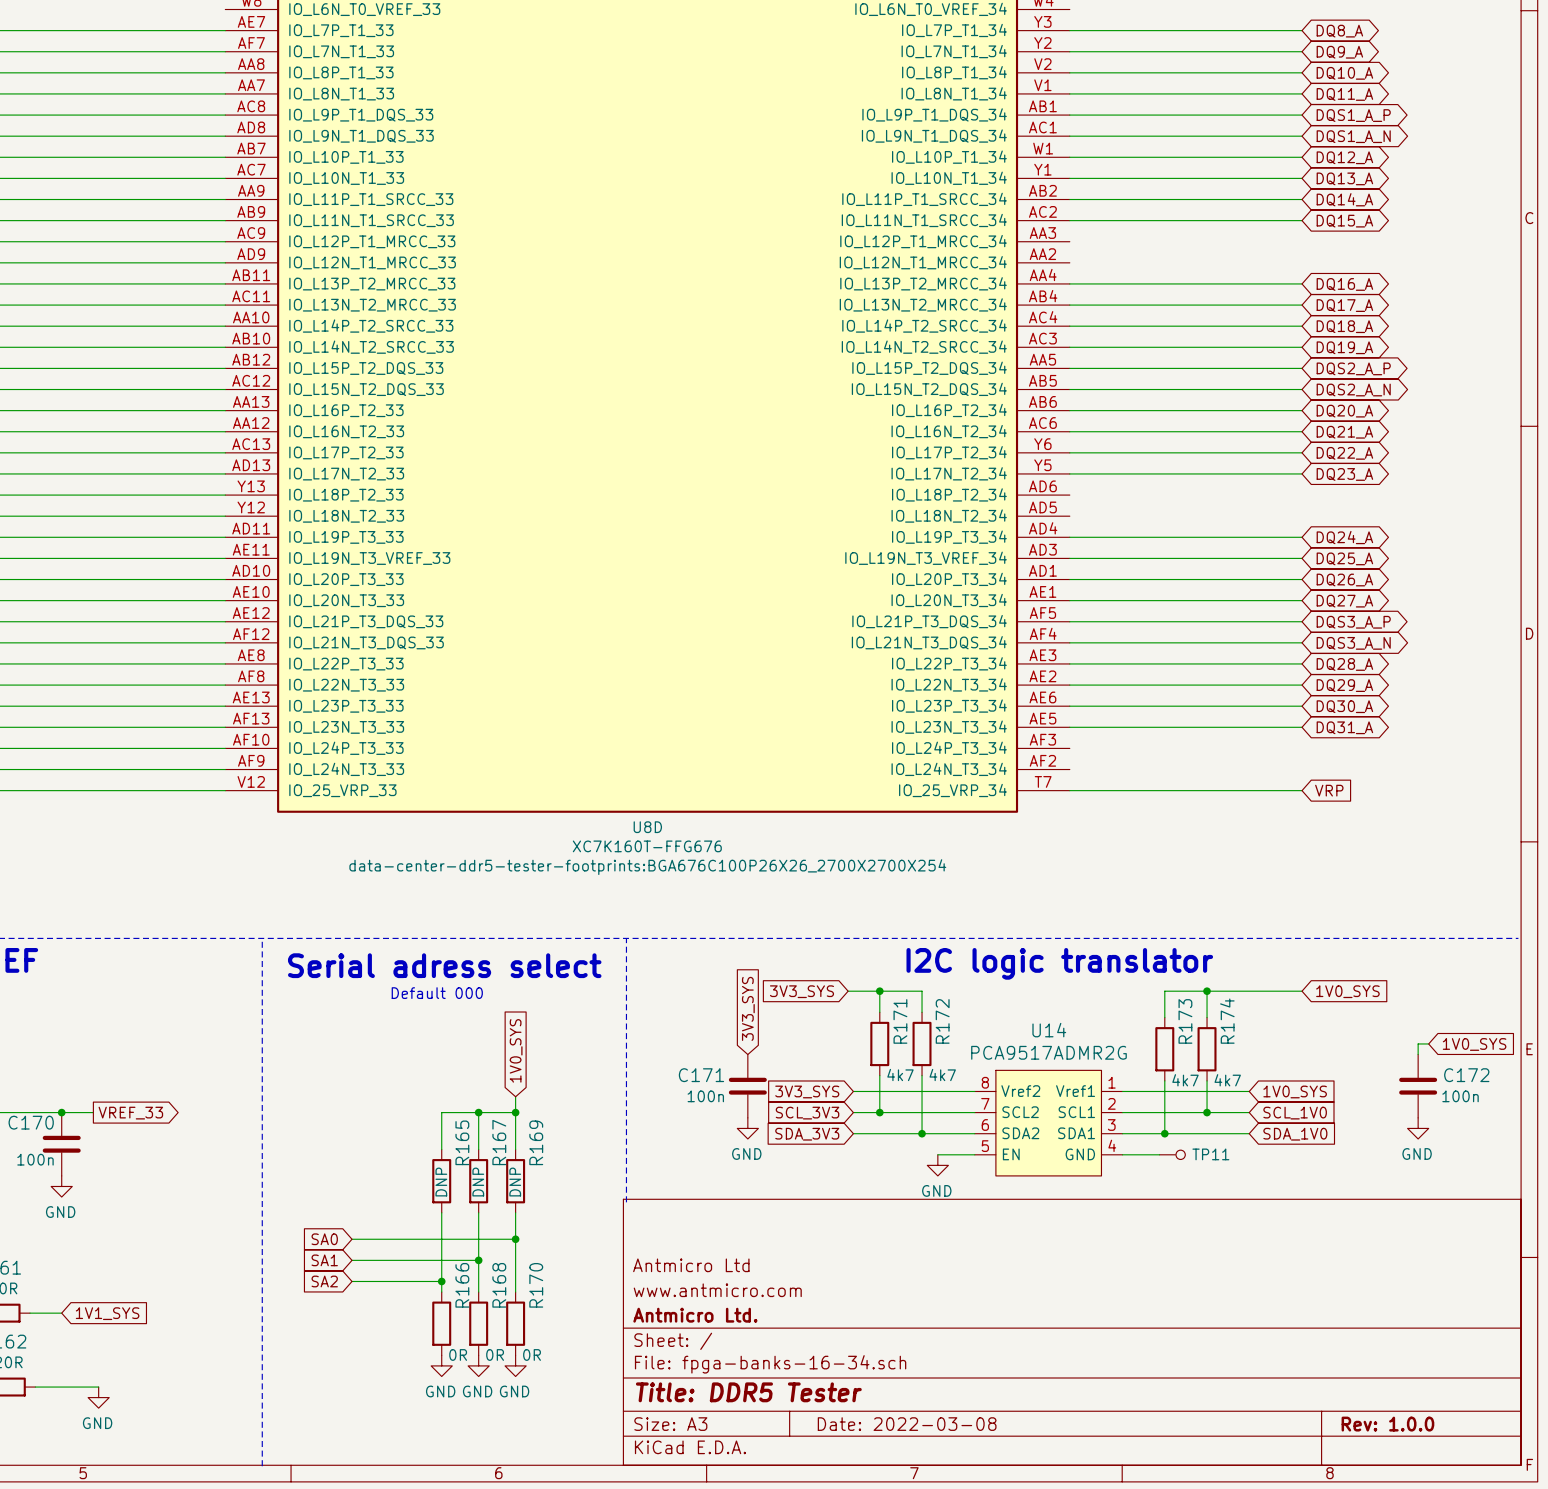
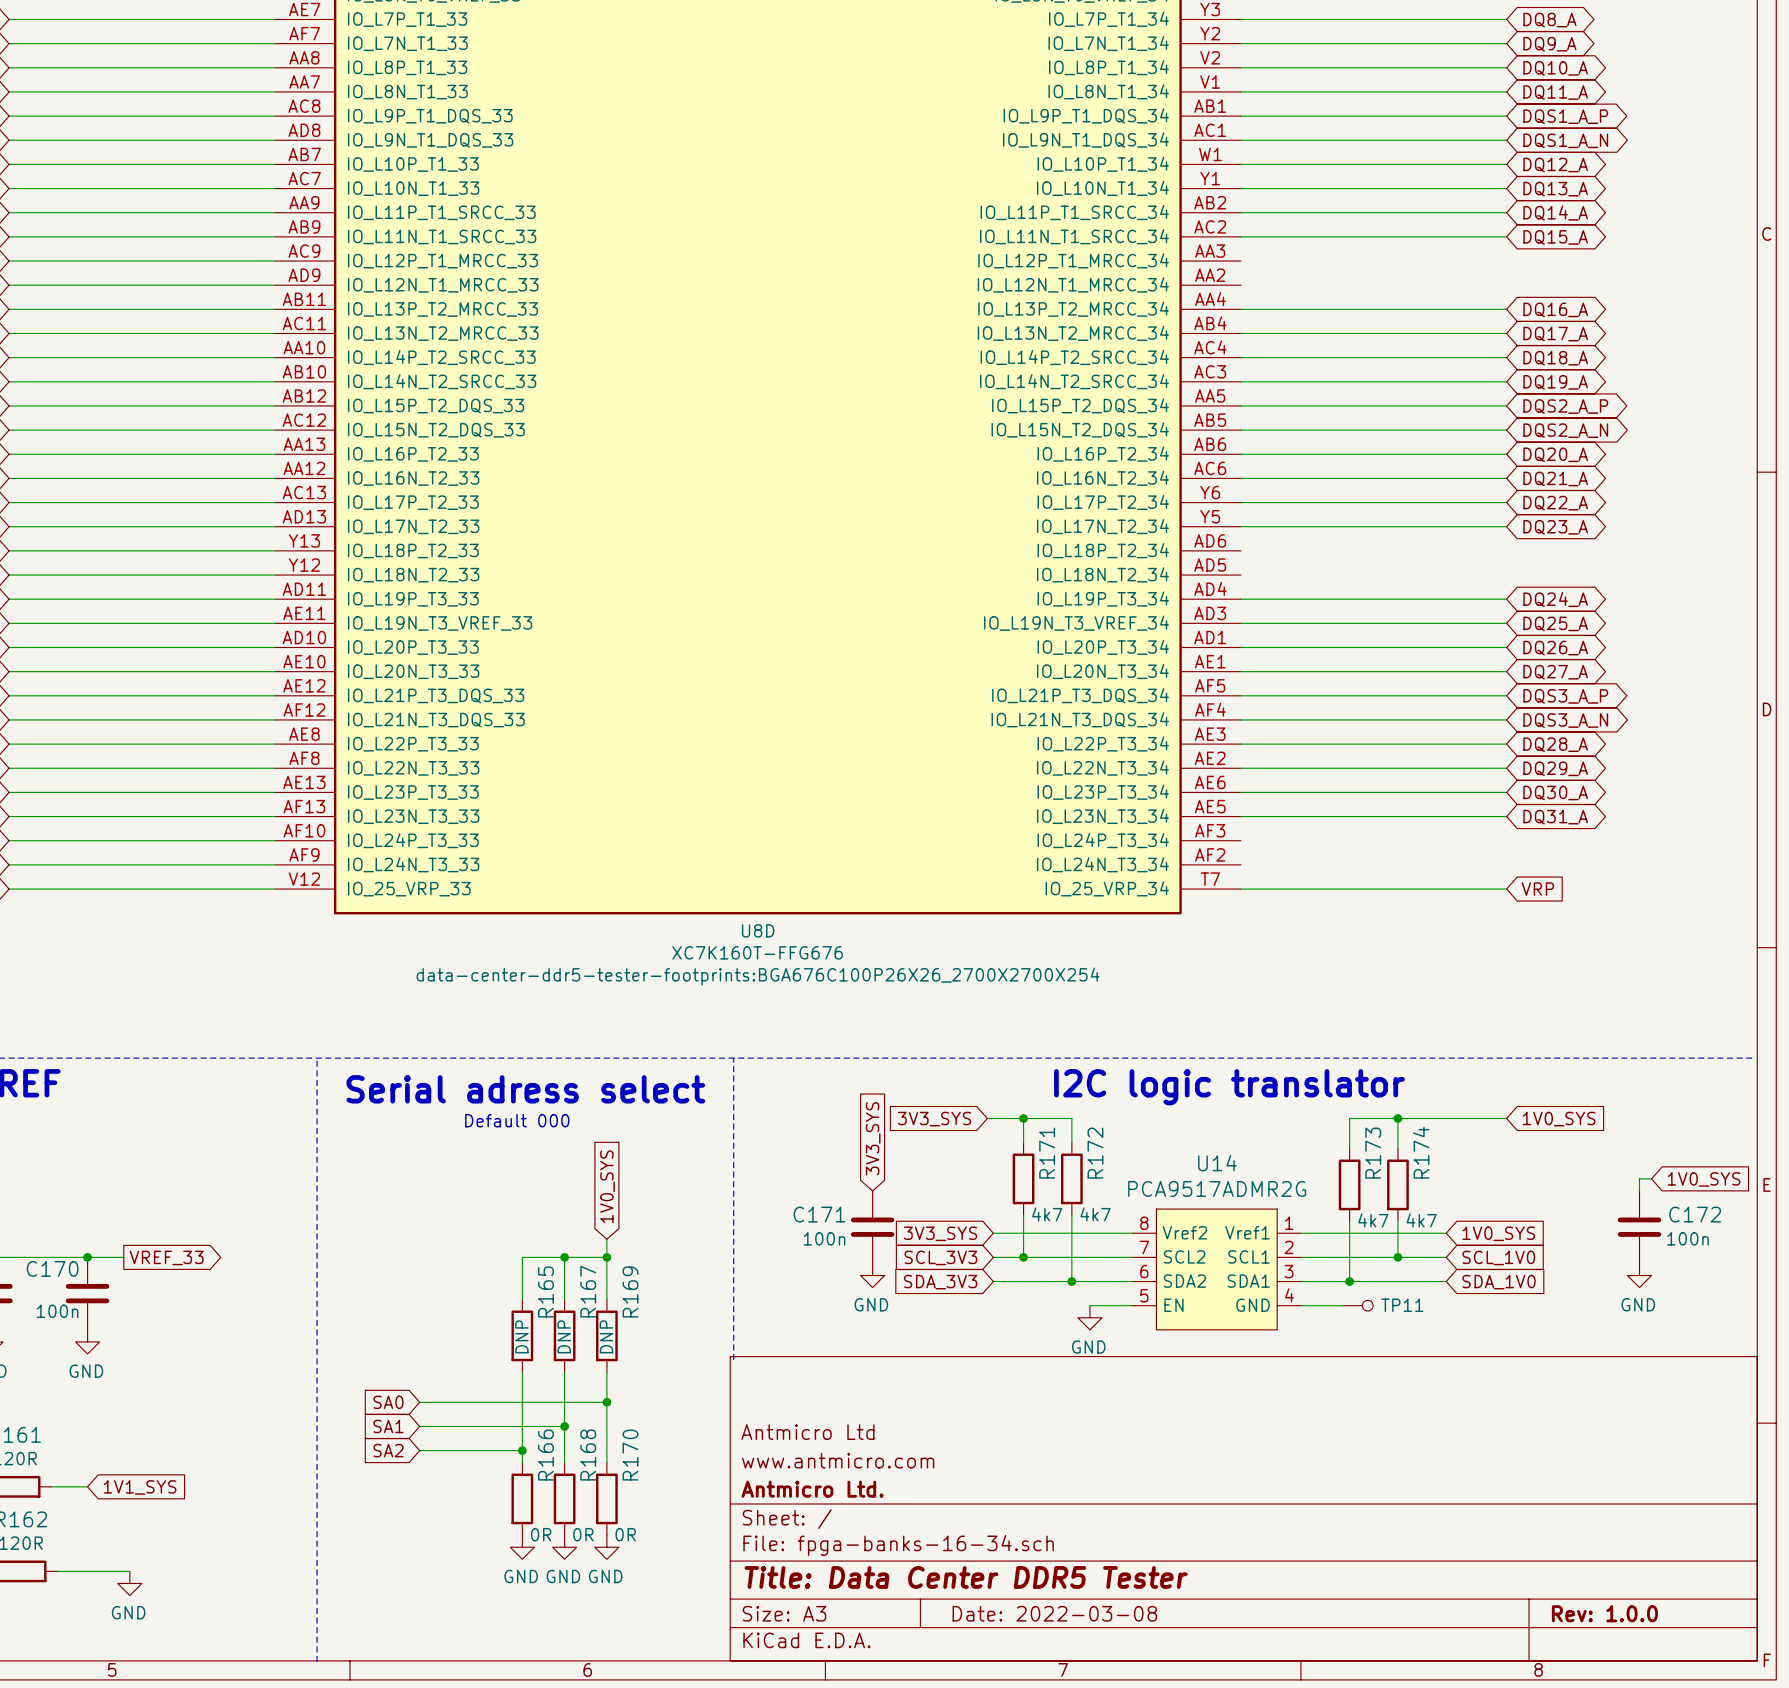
title block: Title: DDR5 Tester (748, 1392) -> Title: Data Center DDR5 Tester (966, 1577)

